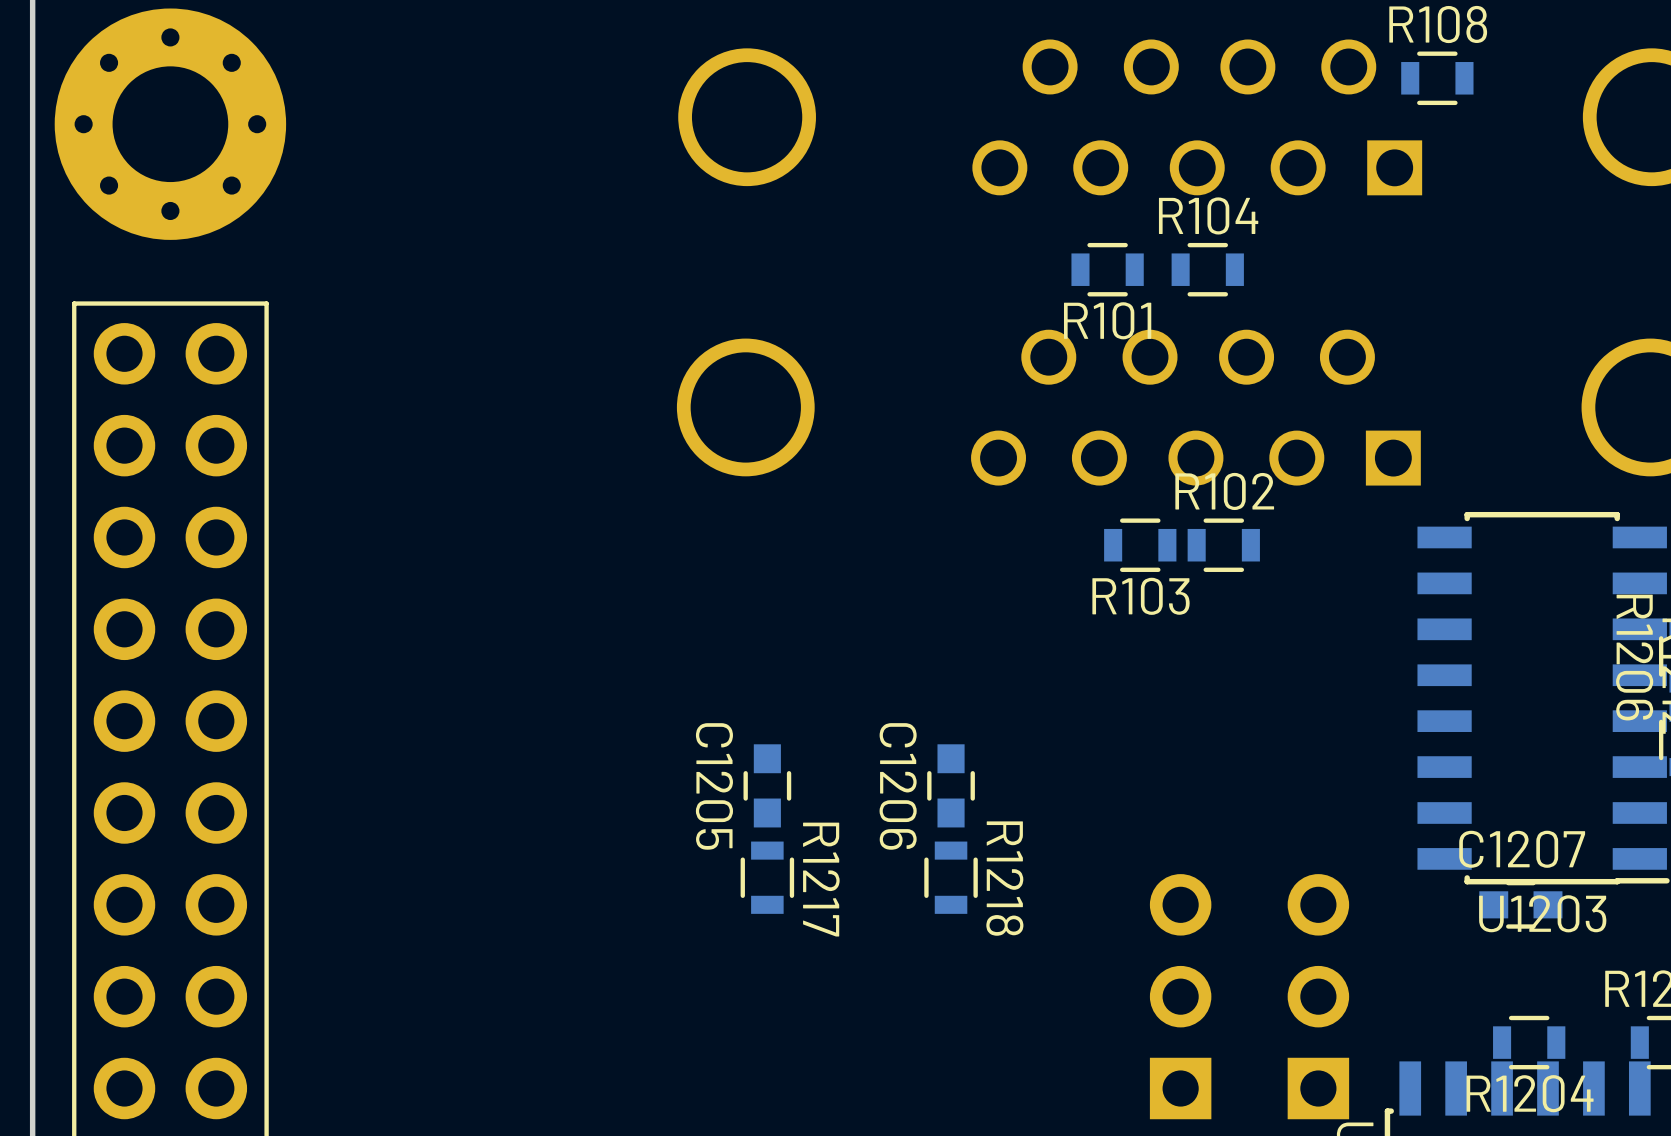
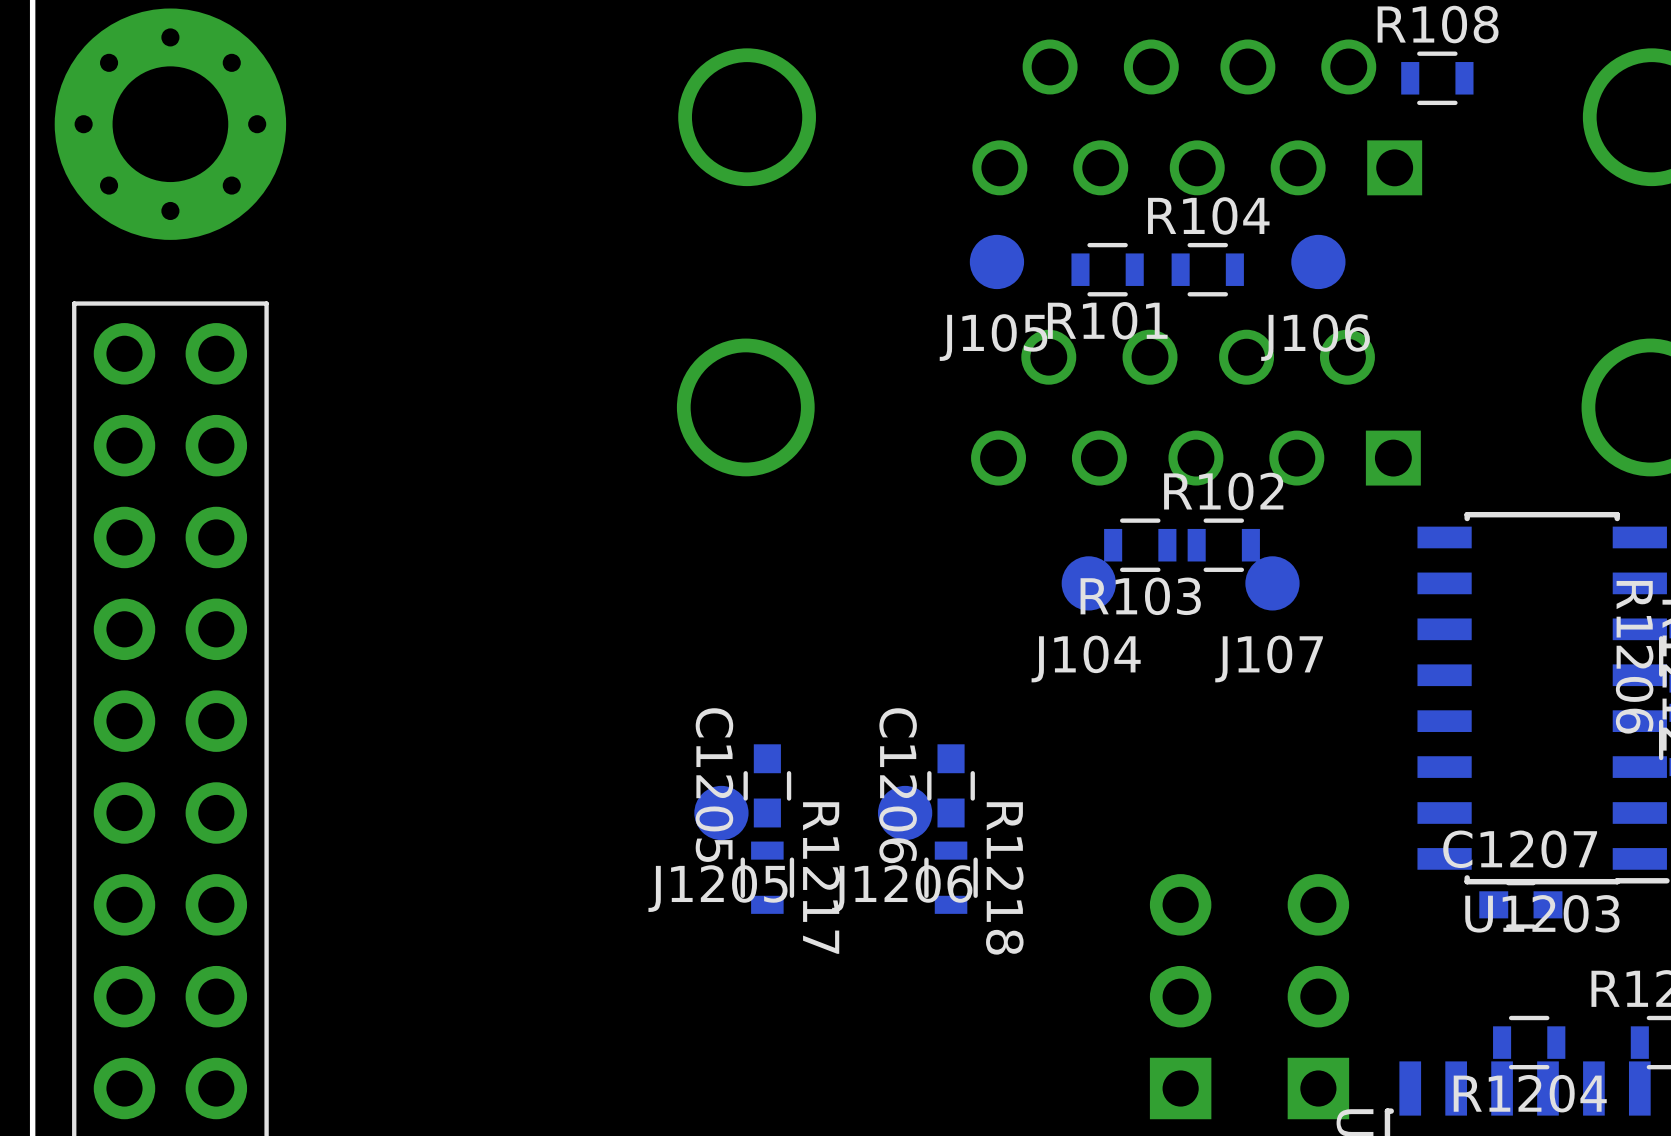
J105: none -> (996, 261)
J106: none -> (1318, 261)
J104: none -> (1088, 583)
J107: none -> (1272, 583)
J1205: none -> (721, 812)
J1206: none -> (905, 812)

